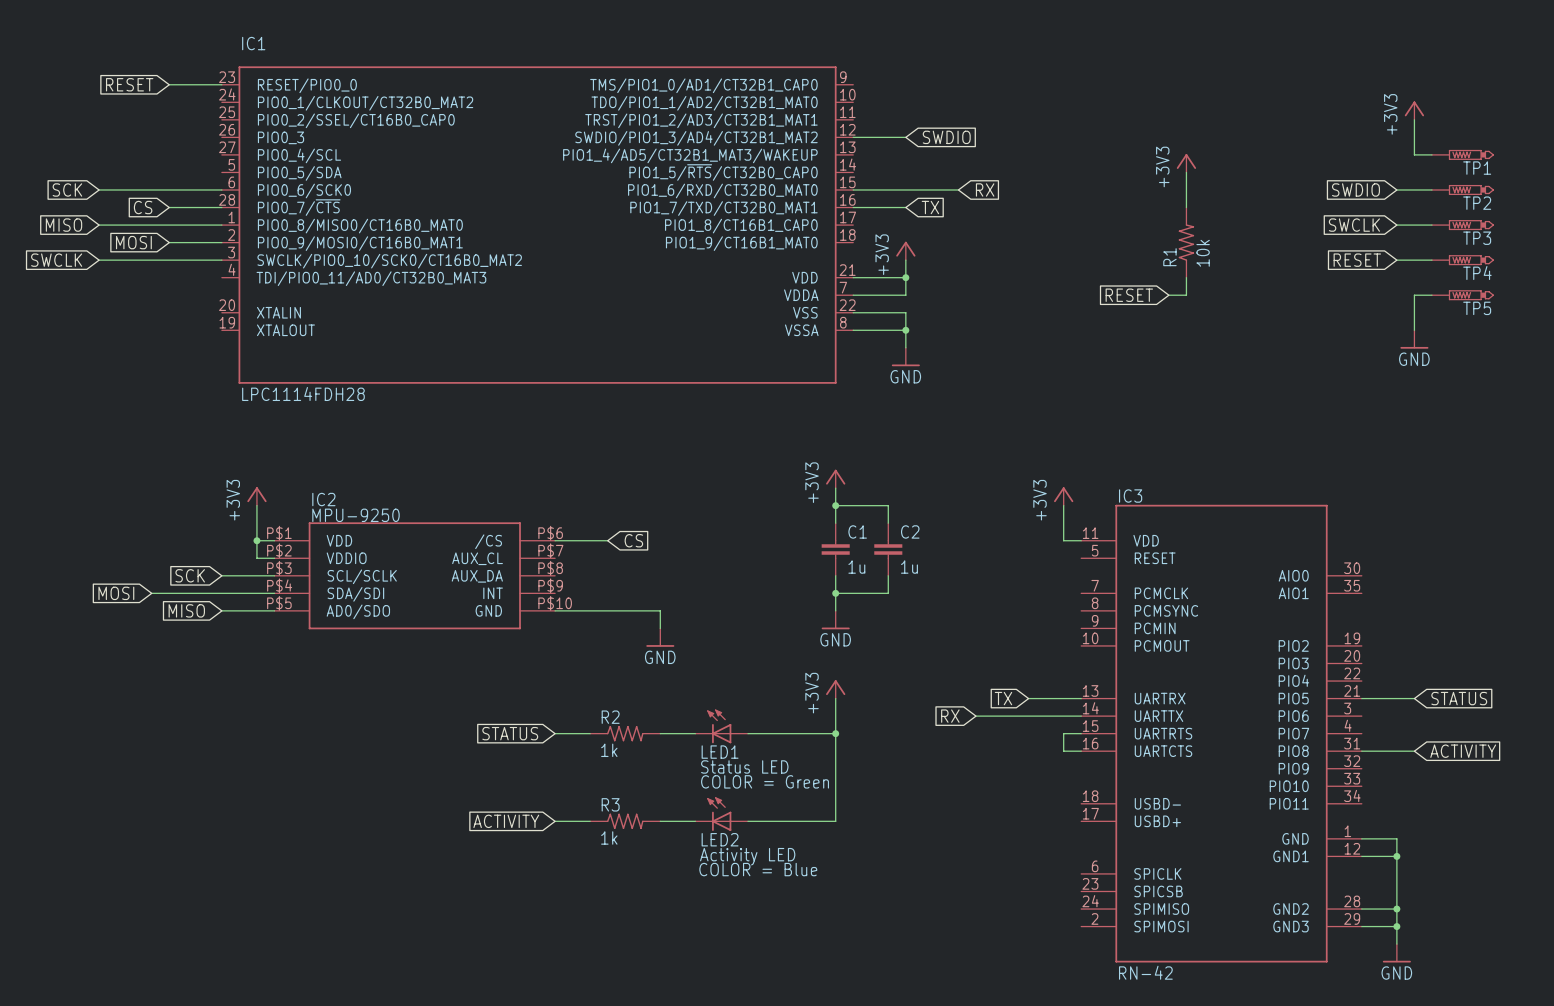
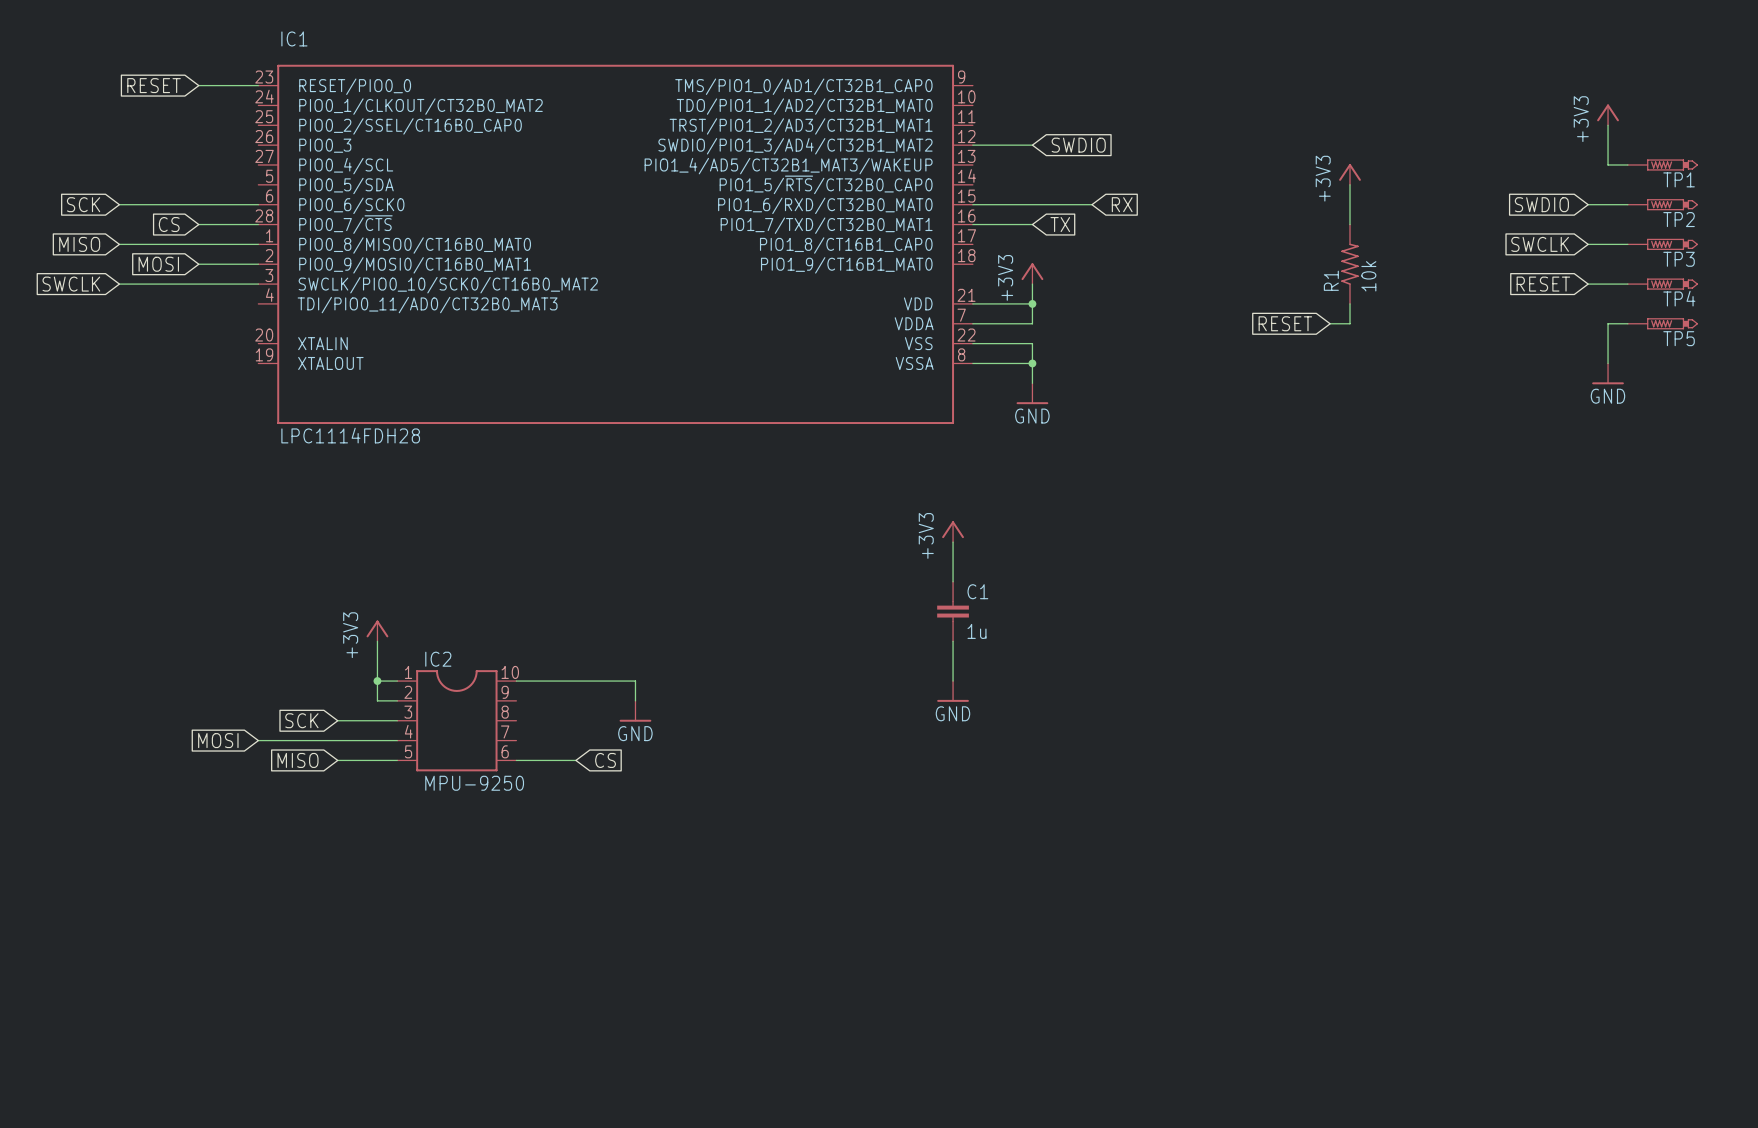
power symbol position: +3V3 (256, 496) -> +3V3 (377, 630)
power symbol: +3V3 (1063, 496) -> none
IC2 name position: IC2 (323, 499) -> IC2 (438, 659)
wire: (256, 505) (256, 558) (274, 558) -> (377, 641) (377, 700) (397, 700)
wire: (835, 505) (888, 505) (888, 523) -> none
junction: (835, 505) -> none
wire: (1063, 505) (1063, 540) (1081, 540) -> none
IC2 value position: MPU-9250 (355, 515) -> MPU-9250 (474, 783)
IC2 symbol: [274, 522, 556, 630] -> [397, 670, 517, 772]
wire: (256, 540) (274, 540) -> (377, 681) (397, 681)
junction: (256, 540) -> none
wire: (555, 540) (607, 540) -> none
global label: CS (633, 540) -> none
C2: 1u (888, 549) -> none
global label position: SCK (190, 575) -> SCK (301, 720)
wire: (221, 575) (274, 575) -> (337, 720) (397, 720)
wire: (888, 575) (888, 593) (835, 593) -> none
global label position: MOSI (116, 593) -> MOSI (218, 740)
wire: (151, 593) (274, 593) -> (258, 740) (397, 740)
junction: (835, 593) -> none
global label position: MISO (186, 610) -> MISO (298, 760)
wire: (221, 610) (274, 610) -> (337, 760) (397, 760)
junction: none -> (377, 681)
wire: (555, 610) (660, 610) (660, 628) -> (516, 681) (635, 681) (635, 700)
power symbol position: GND (660, 637) -> GND (635, 711)
wire: none -> (516, 760) (575, 760)
global label: none -> CS (605, 760)
power symbol: +3V3 (835, 689) -> none
wire: (835, 698) (835, 821) (748, 821) -> none
global label: TX (1003, 698) -> none
wire: (1028, 698) (1081, 698) -> none
wire: (1361, 698) (1414, 698) -> none
global label: STATUS (1459, 698) -> none
global label: RX (950, 716) -> none
wire: (975, 716) (1081, 716) -> none
LED1: Status LED (721, 726) -> none
global label: STATUS (510, 733) -> none
wire: (555, 733) (590, 733) -> none
R2: 1k (625, 733) -> none
wire: (660, 733) (695, 733) -> none
wire: (748, 733) (835, 733) -> none
junction: (835, 733) -> none
wire: (1081, 733) (1063, 733) (1063, 751) (1081, 751) -> none
IC3: RN-42 (1221, 733) -> none
wire: (1361, 751) (1414, 751) -> none
global label: ACTIVITY (1463, 751) -> none
LED2: Activity LED (721, 814) -> none
global label: ACTIVITY (506, 821) -> none
wire: (555, 821) (590, 821) -> none
R3: 1k (625, 821) -> none
wire: (660, 821) (695, 821) -> none
wire: (1361, 838) (1396, 838) (1396, 944) -> none
wire: (1361, 856) (1396, 856) -> none
junction: (1396, 856) -> none
wire: (1361, 909) (1396, 909) -> none
junction: (1396, 909) -> none
wire: (1361, 926) (1396, 926) -> none
junction: (1396, 926) -> none
power symbol: GND (1396, 953) -> none

